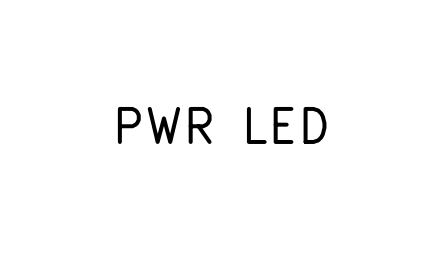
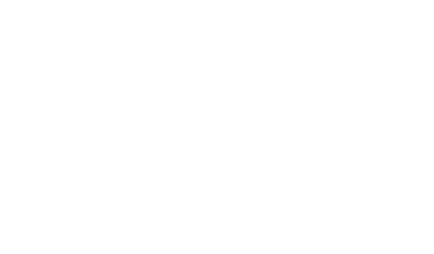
text: PWR LED (222, 125) -> none

